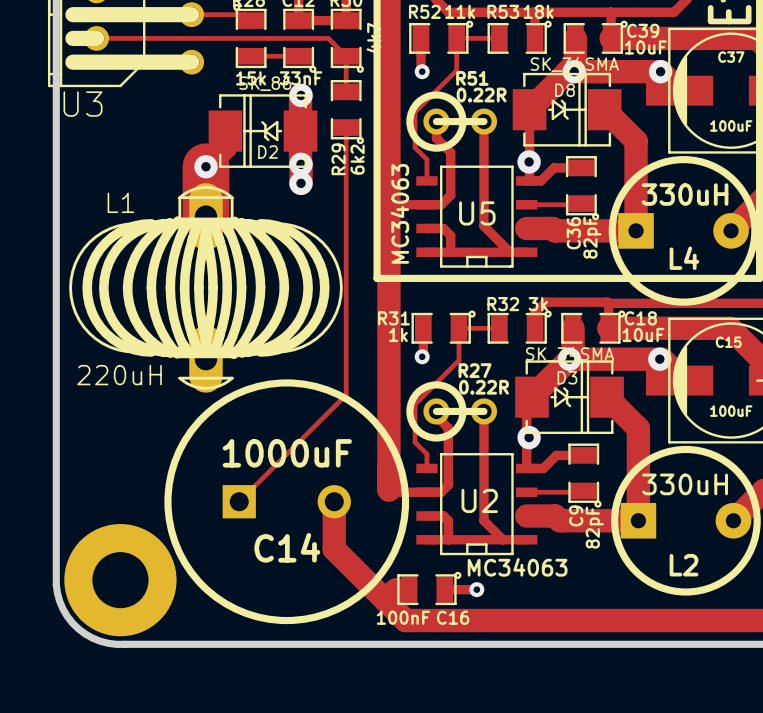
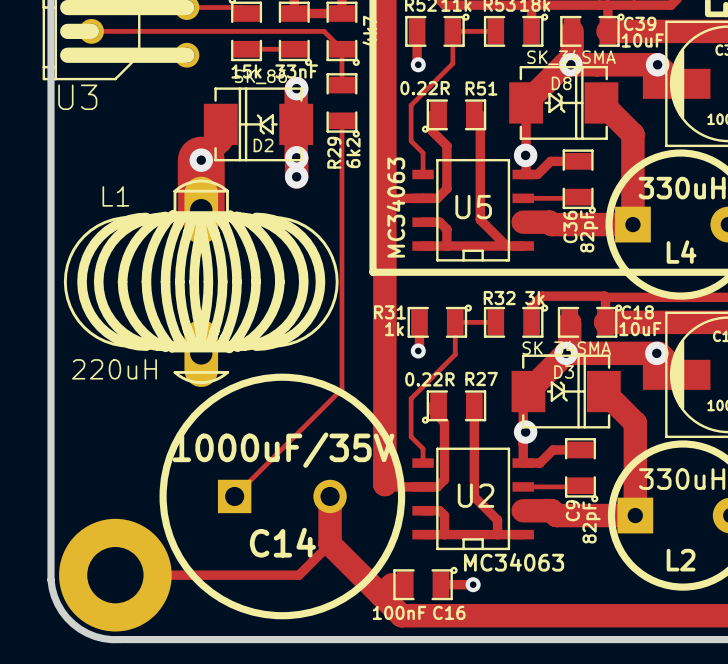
R51 footprint: [406, 91, 498, 152] -> [421, 99, 487, 133]
R51 value position: 0.22R (481, 95) -> 0.22R (425, 88)
R27 footprint: [406, 381, 498, 442] -> [421, 390, 487, 424]
R27 value position: 0.22R (483, 387) -> 0.22R (429, 379)
track: none -> (474, 405) (474, 496) (497, 520) (497, 534)
track: (483, 411) (483, 520) (502, 539) -> none
C14 value: 1000uF (287, 453) -> 1000uF/35V (283, 450)
track: none -> (330, 544) (299, 575) (115, 575)

